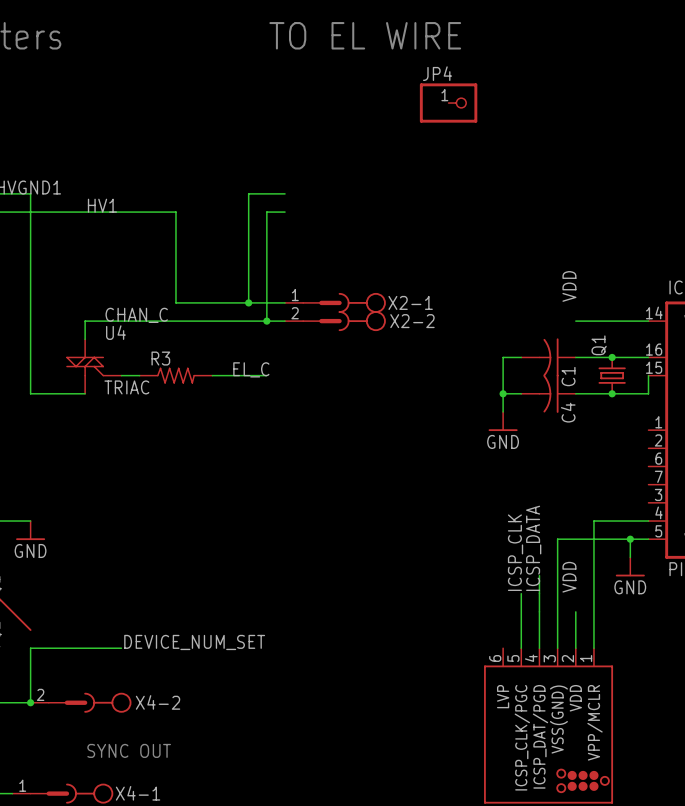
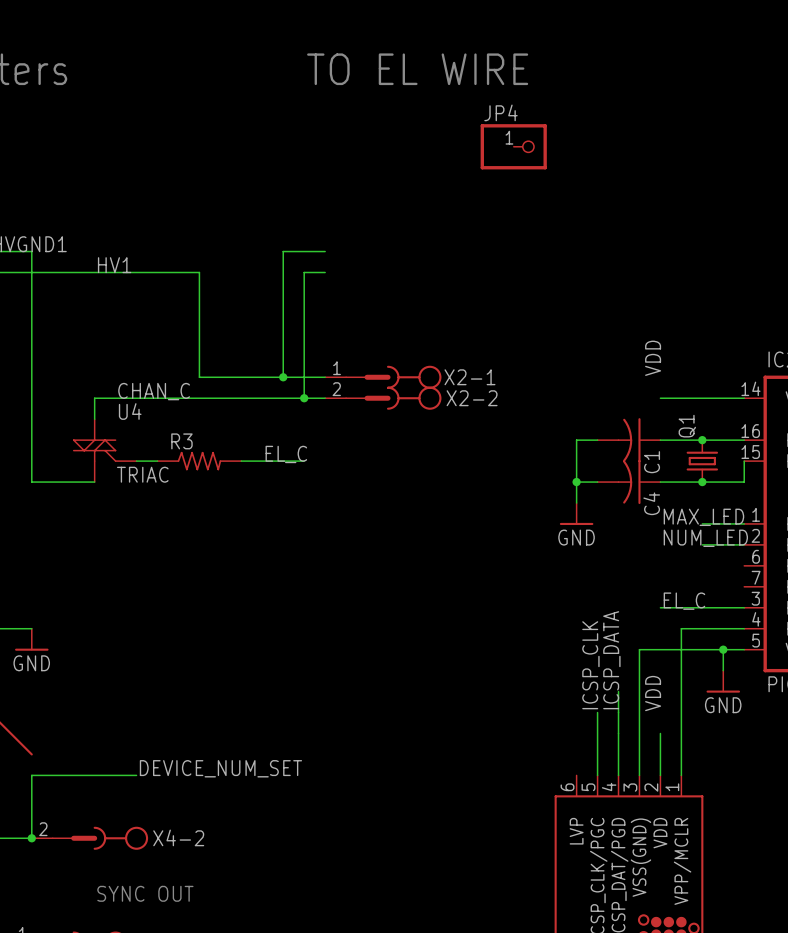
label: none -> MAX_LED (703, 517)
wire: none -> (702, 523) (744, 523)
label: none -> NUM_LED (705, 538)
wire: none -> (702, 544) (744, 544)
label: none -> EL_C (684, 601)
wire: none -> (660, 607) (744, 607)

